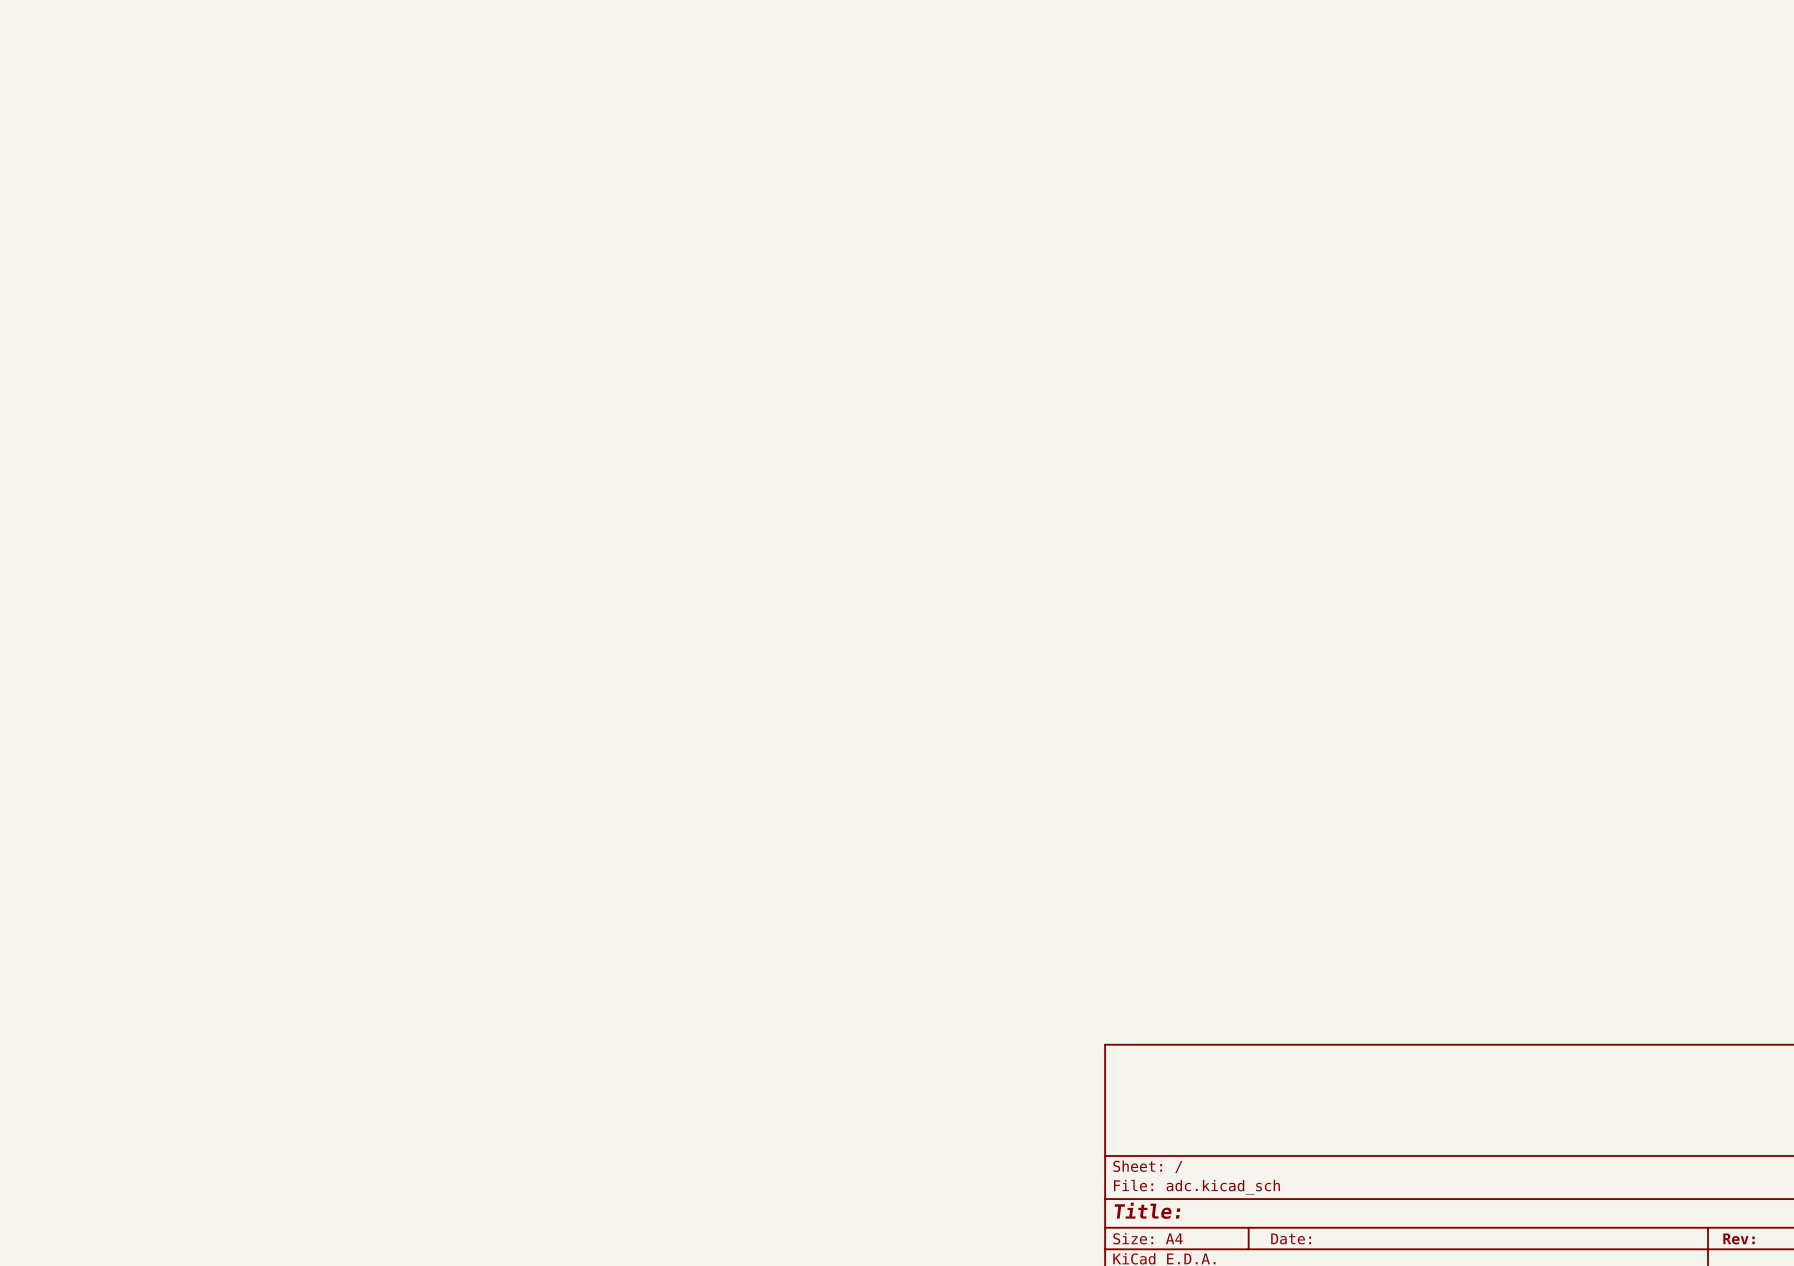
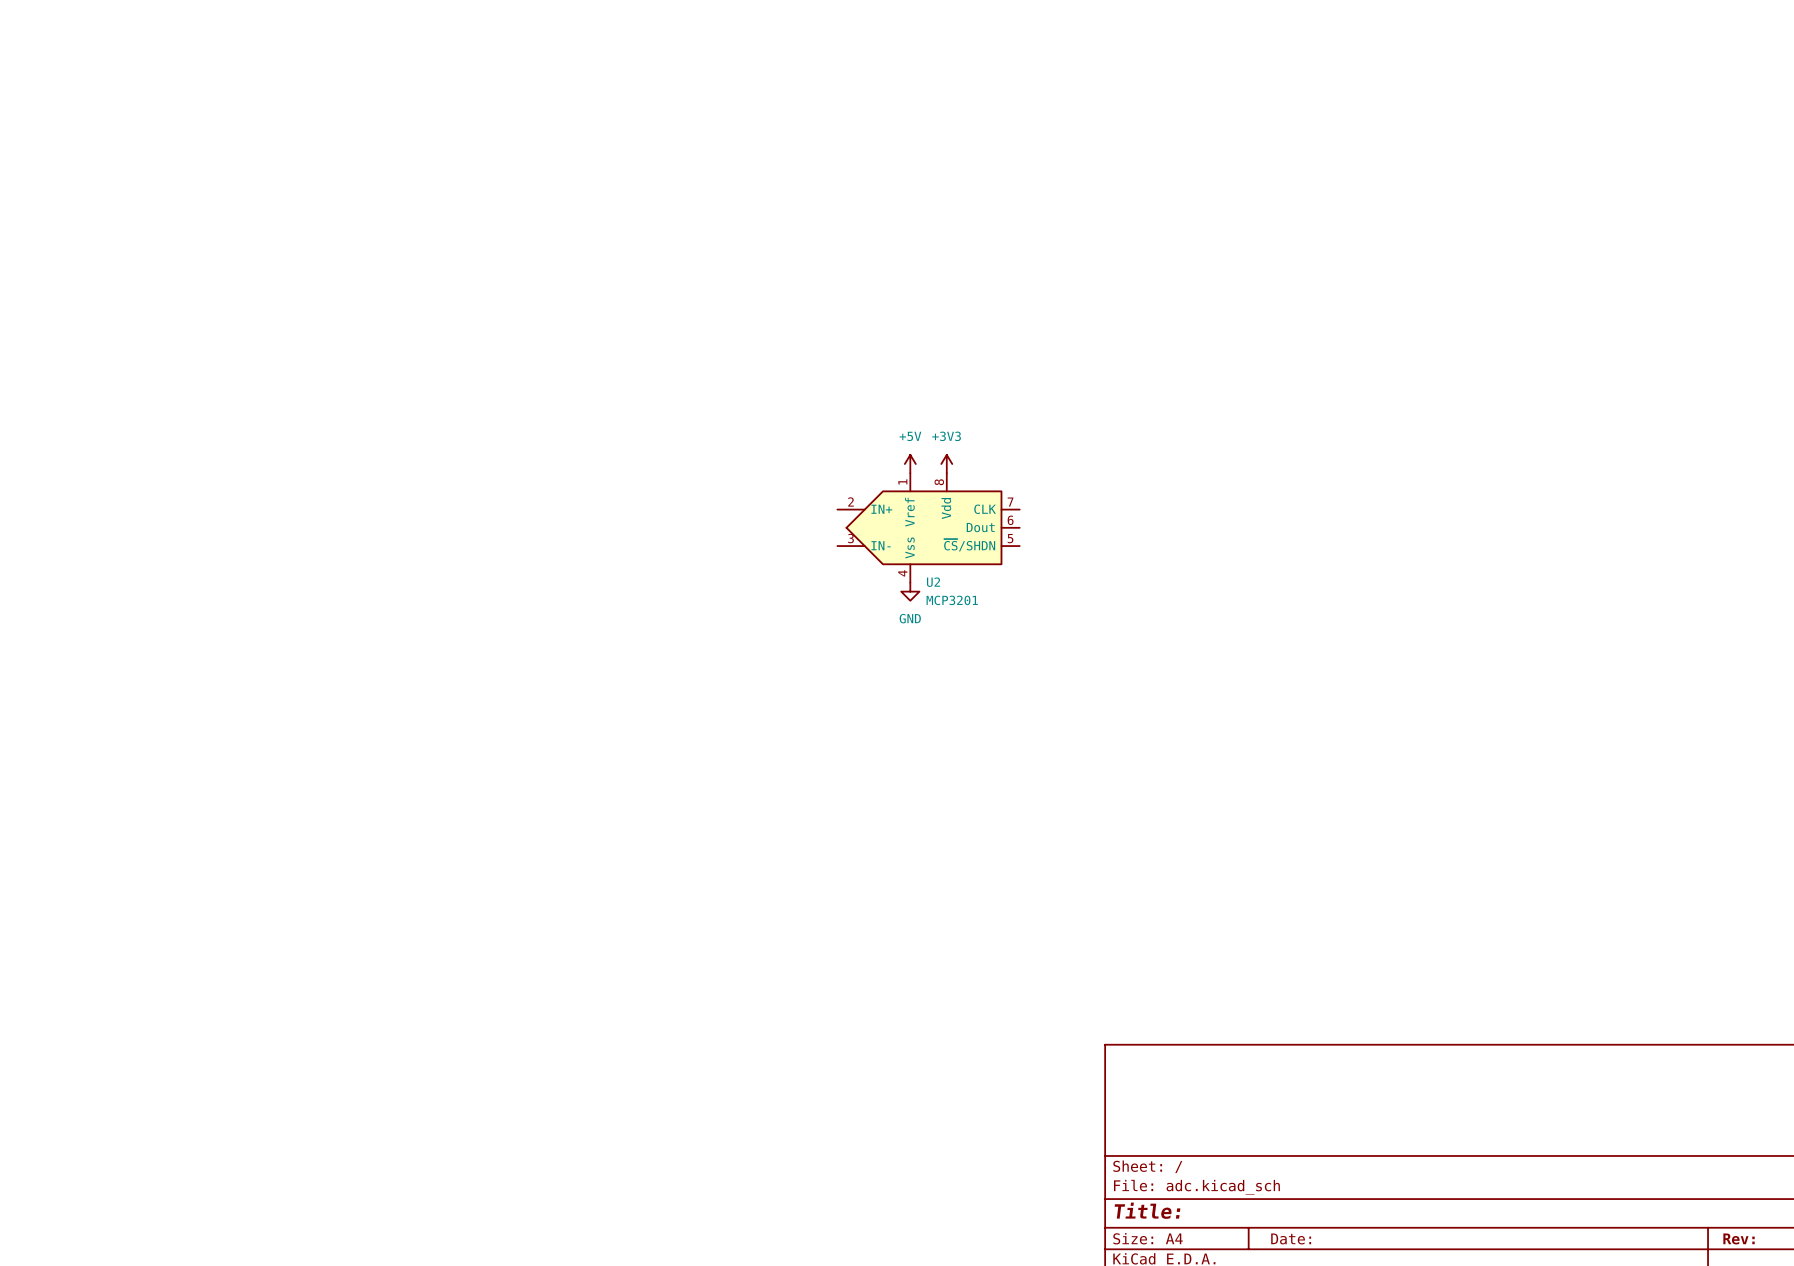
power symbol: none -> +5V (910, 464)
power symbol: none -> +3V3 (946, 464)
U2: none -> MCP3201 (928, 527)
power symbol: none -> GND (910, 591)

